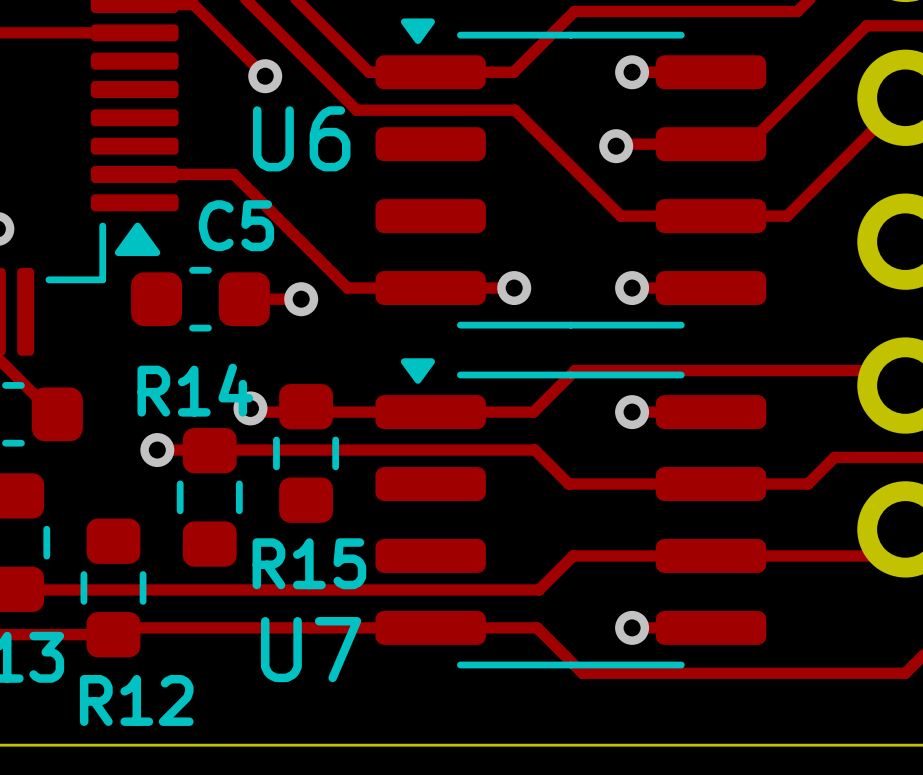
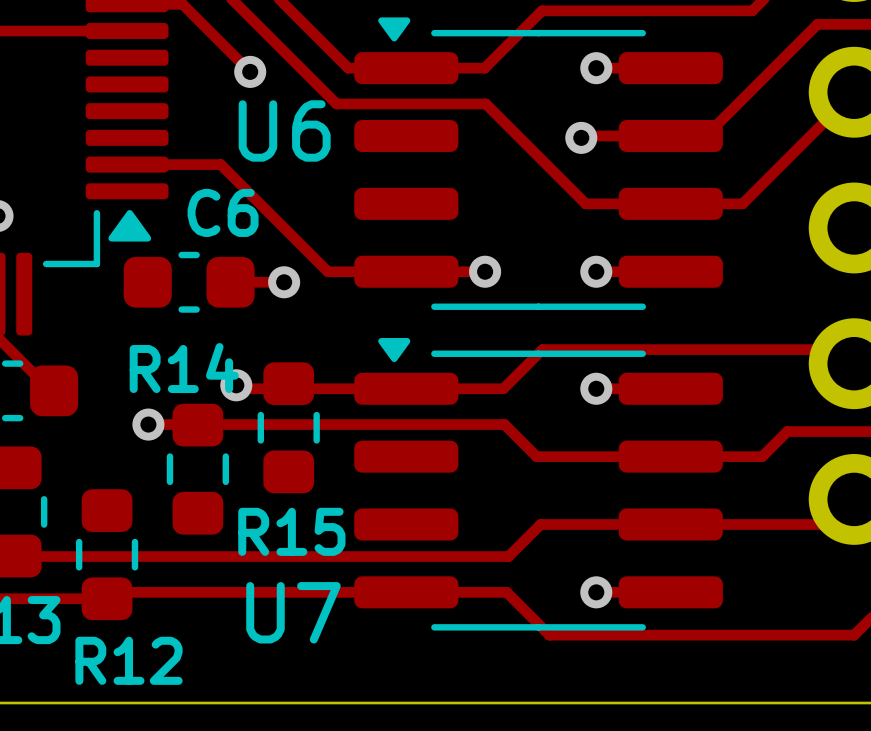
C5 name: C5 (236, 225) -> C6 (223, 212)

